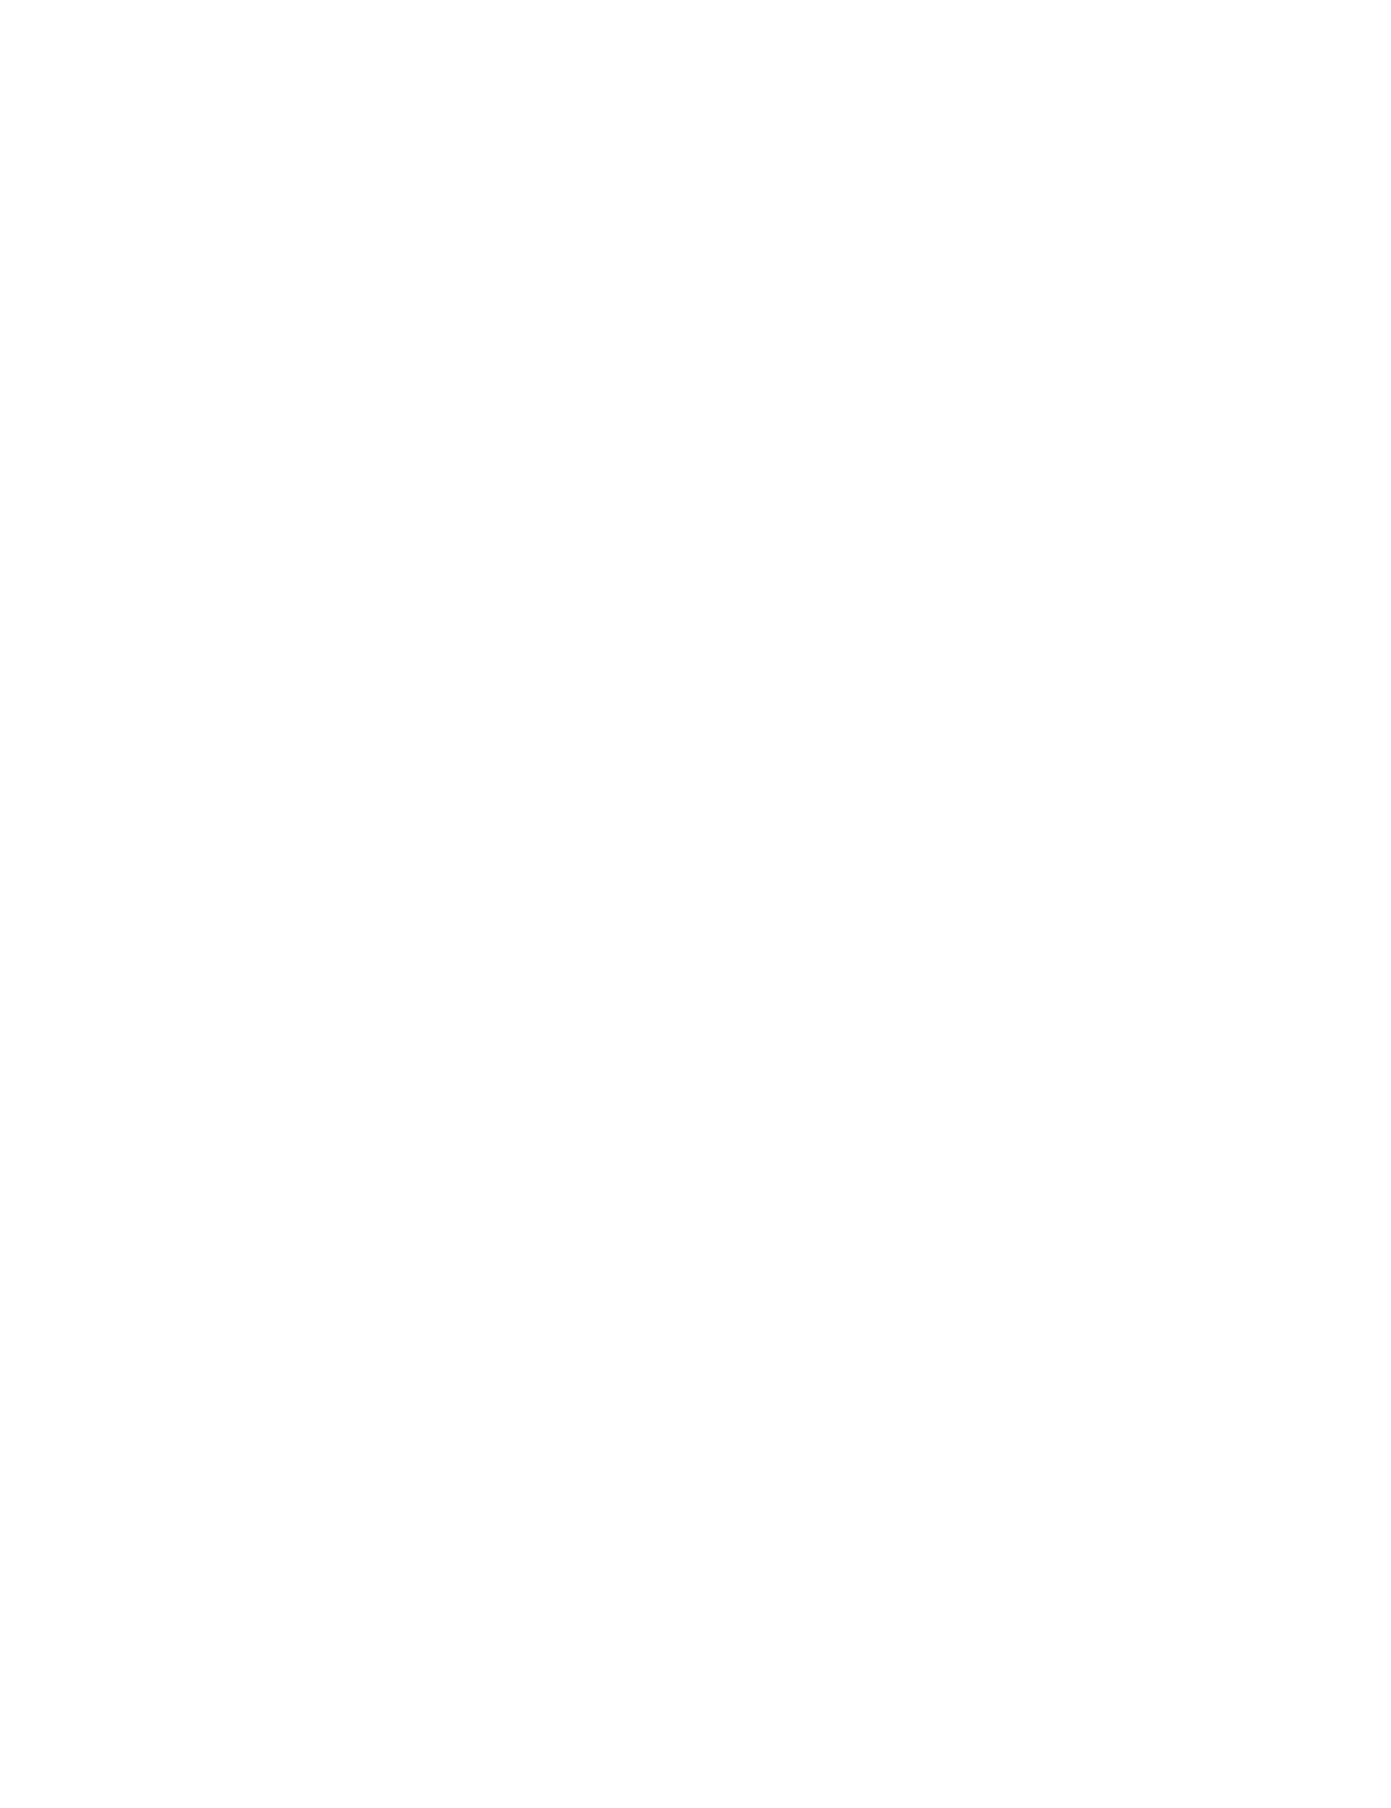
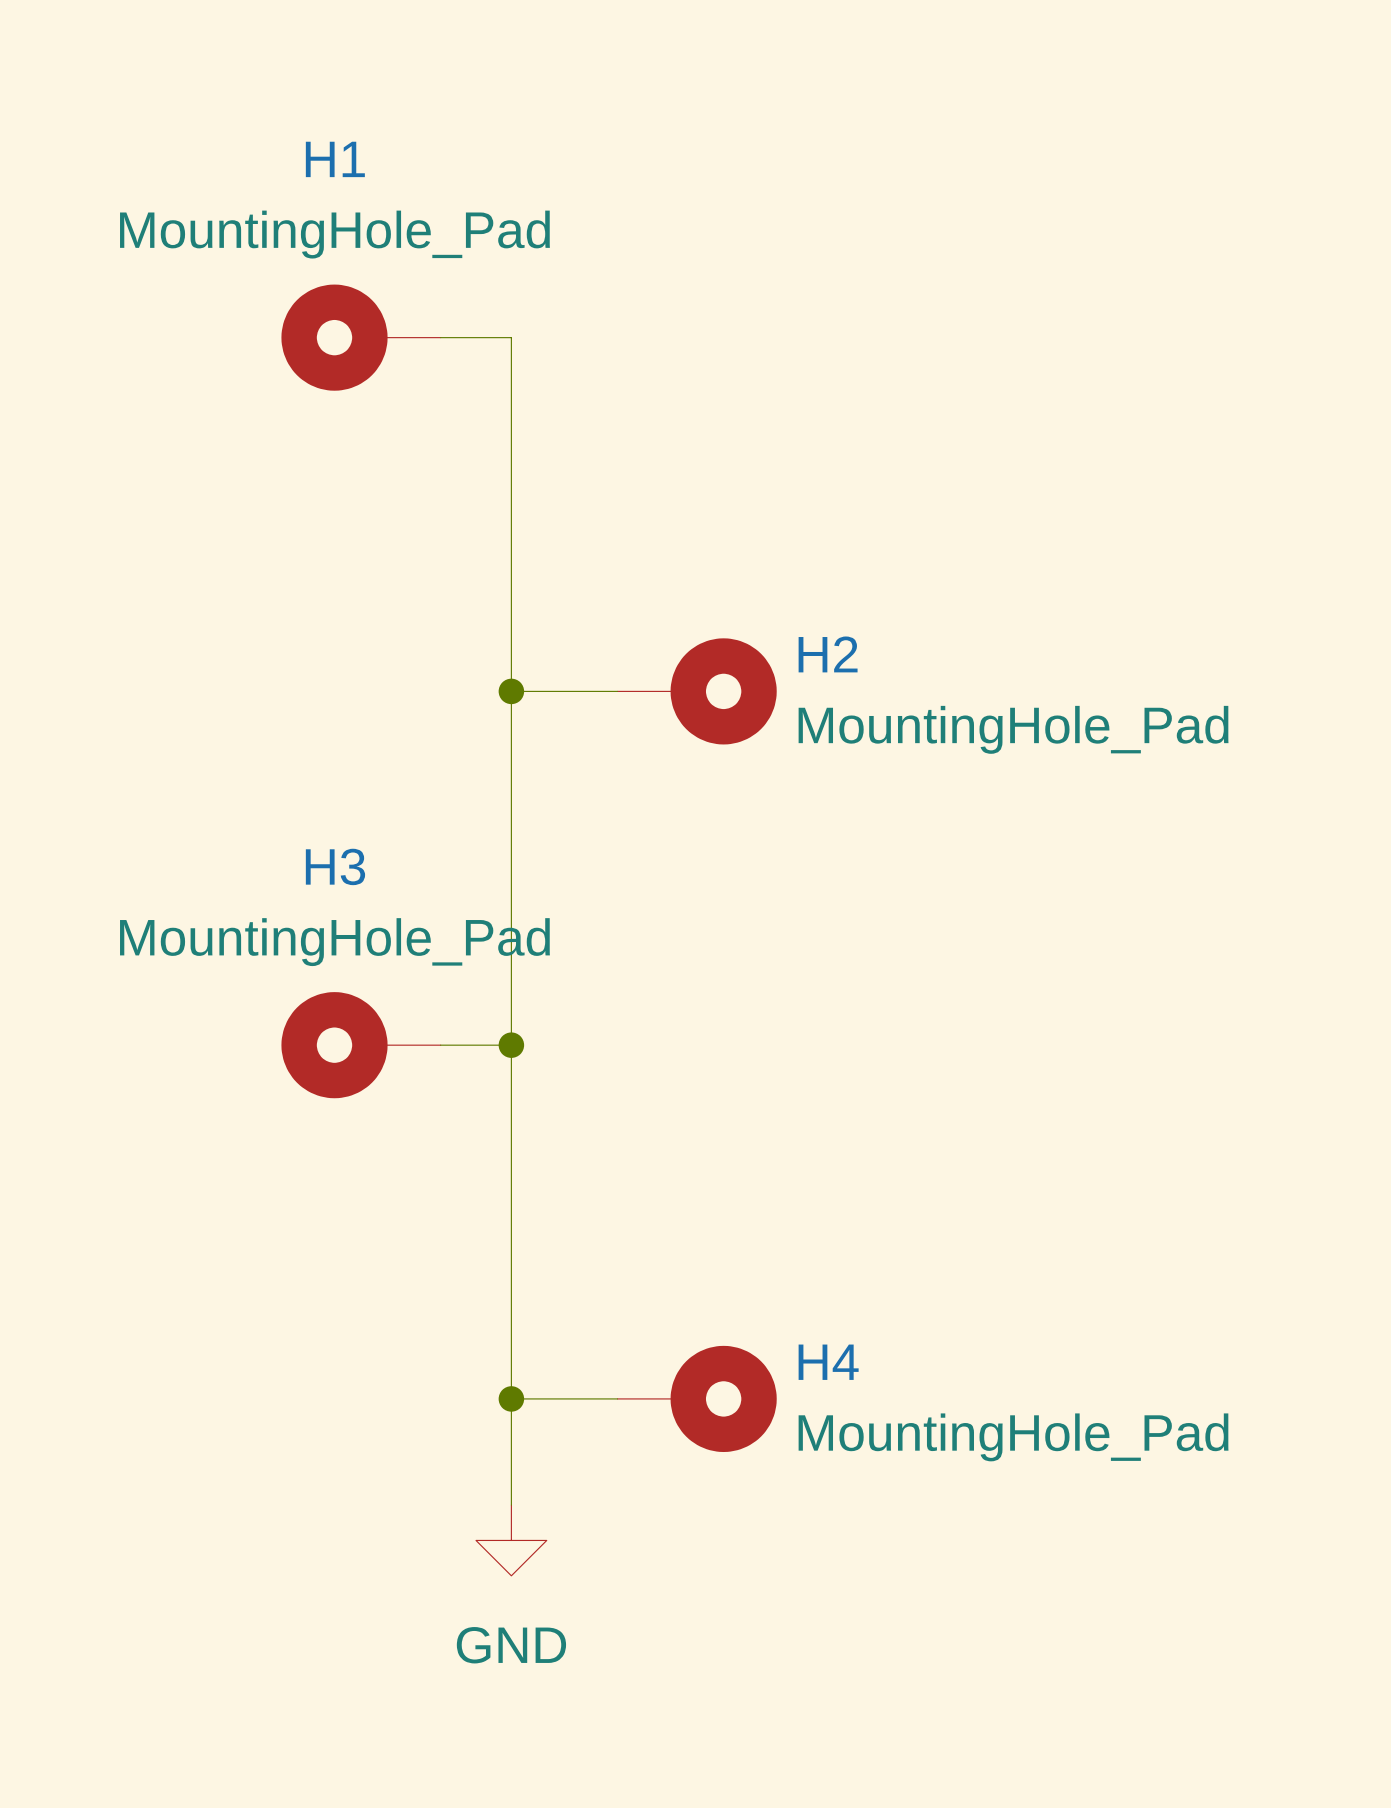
H1: none -> MountingHole_Pad (361, 337)
wire: none -> (440, 337) (511, 337) (511, 1505)
wire: none -> (511, 691) (617, 691)
junction: none -> (511, 691)
H2: none -> MountingHole_Pad (697, 691)
H3: none -> MountingHole_Pad (361, 1045)
wire: none -> (440, 1045) (511, 1045)
junction: none -> (511, 1045)
wire: none -> (511, 1398) (617, 1398)
junction: none -> (511, 1398)
H4: none -> MountingHole_Pad (697, 1398)
power symbol: none -> GND (511, 1540)

